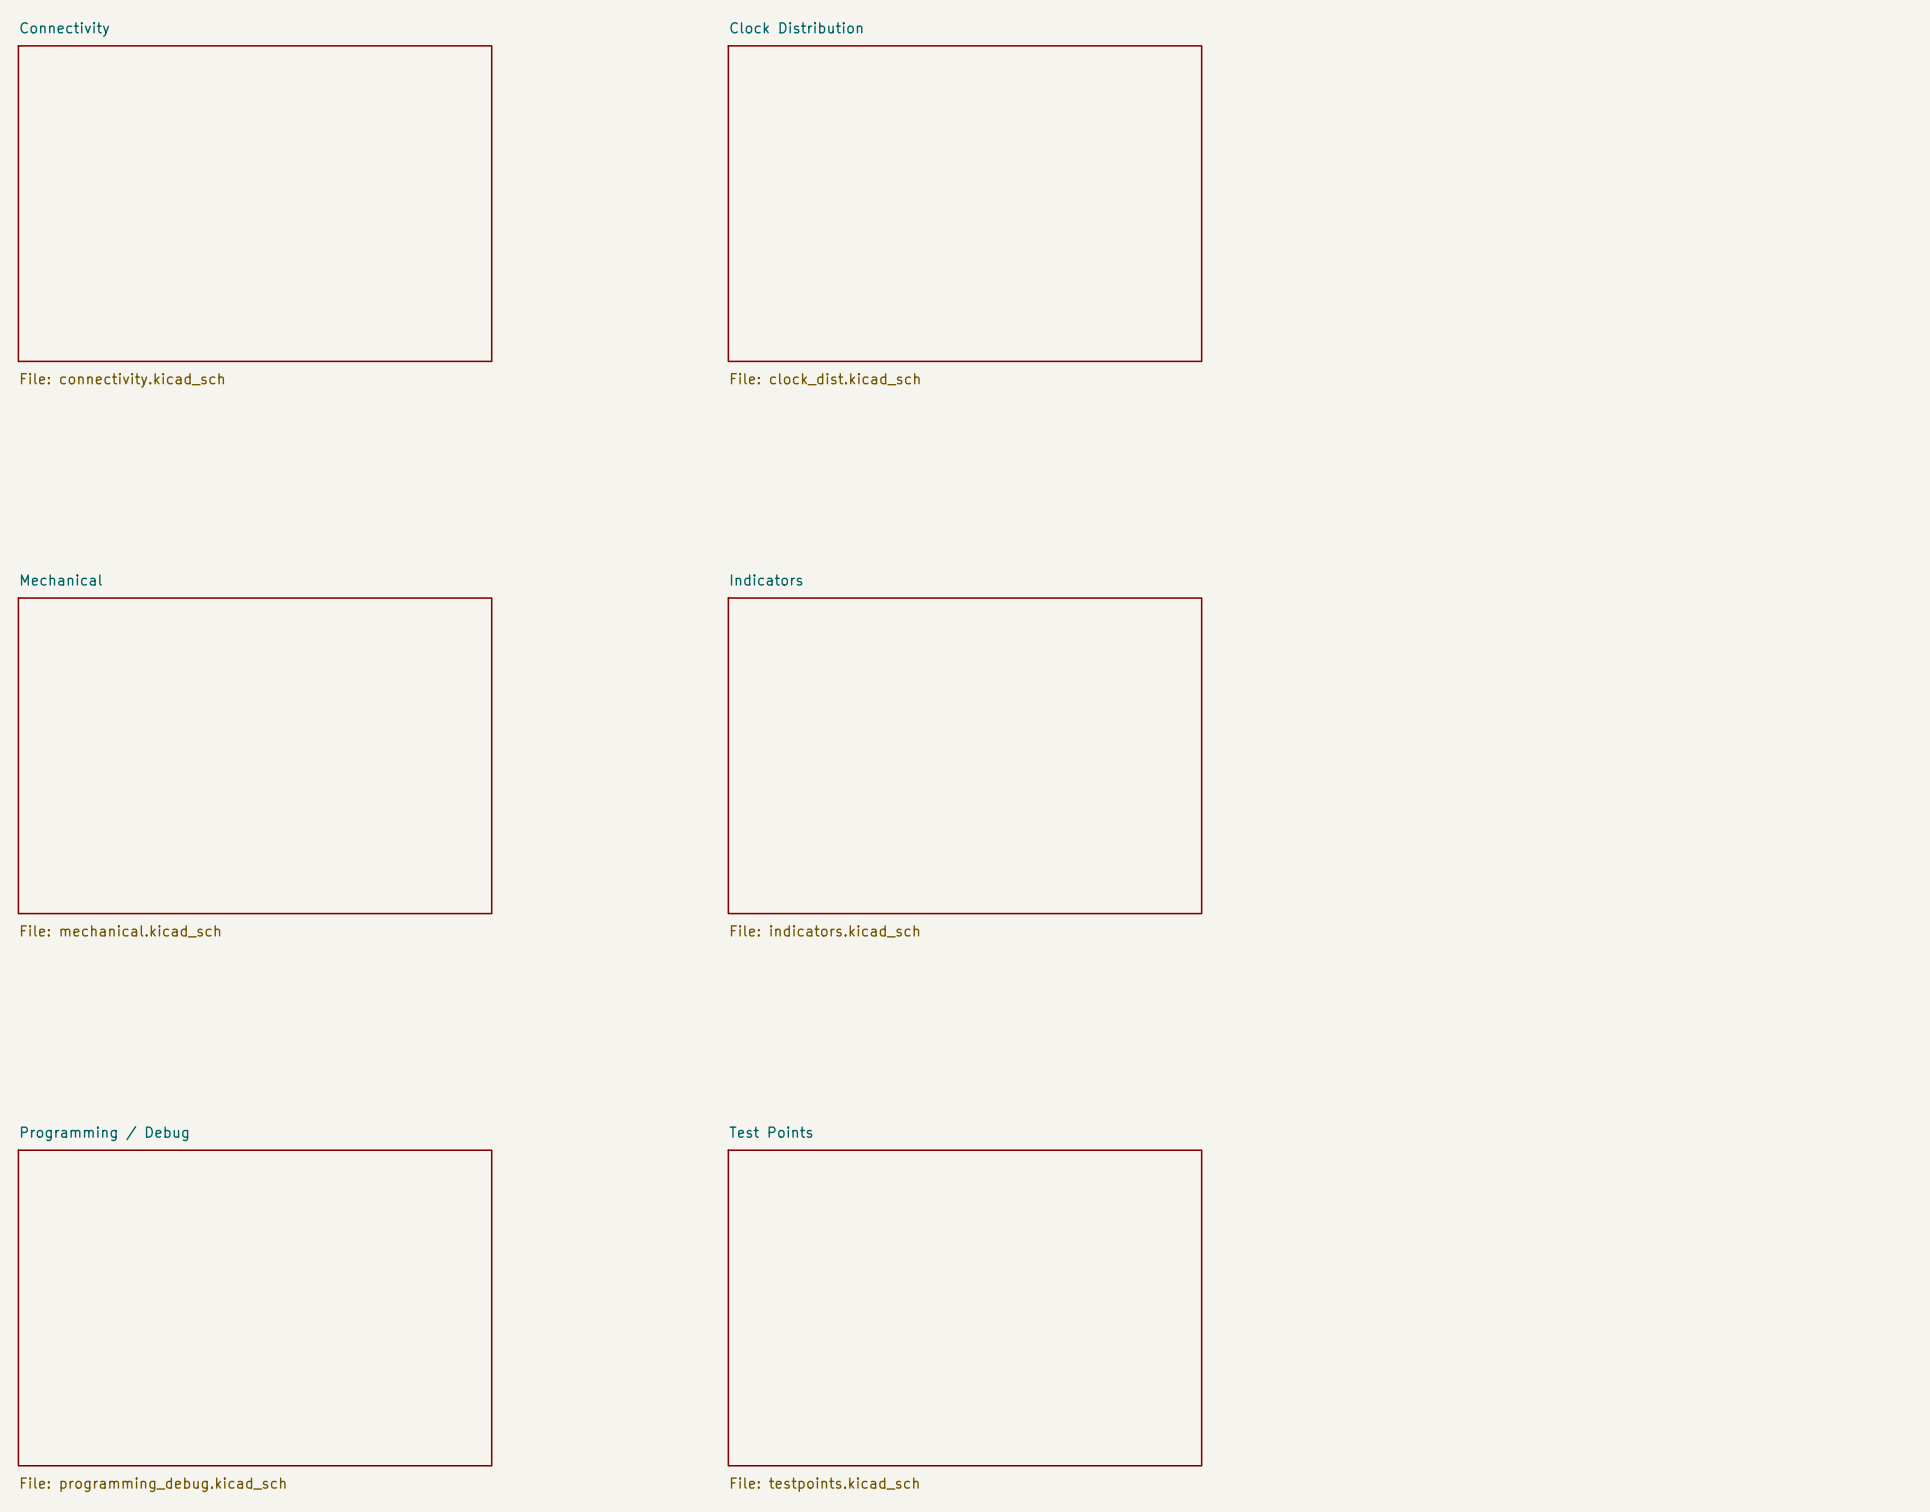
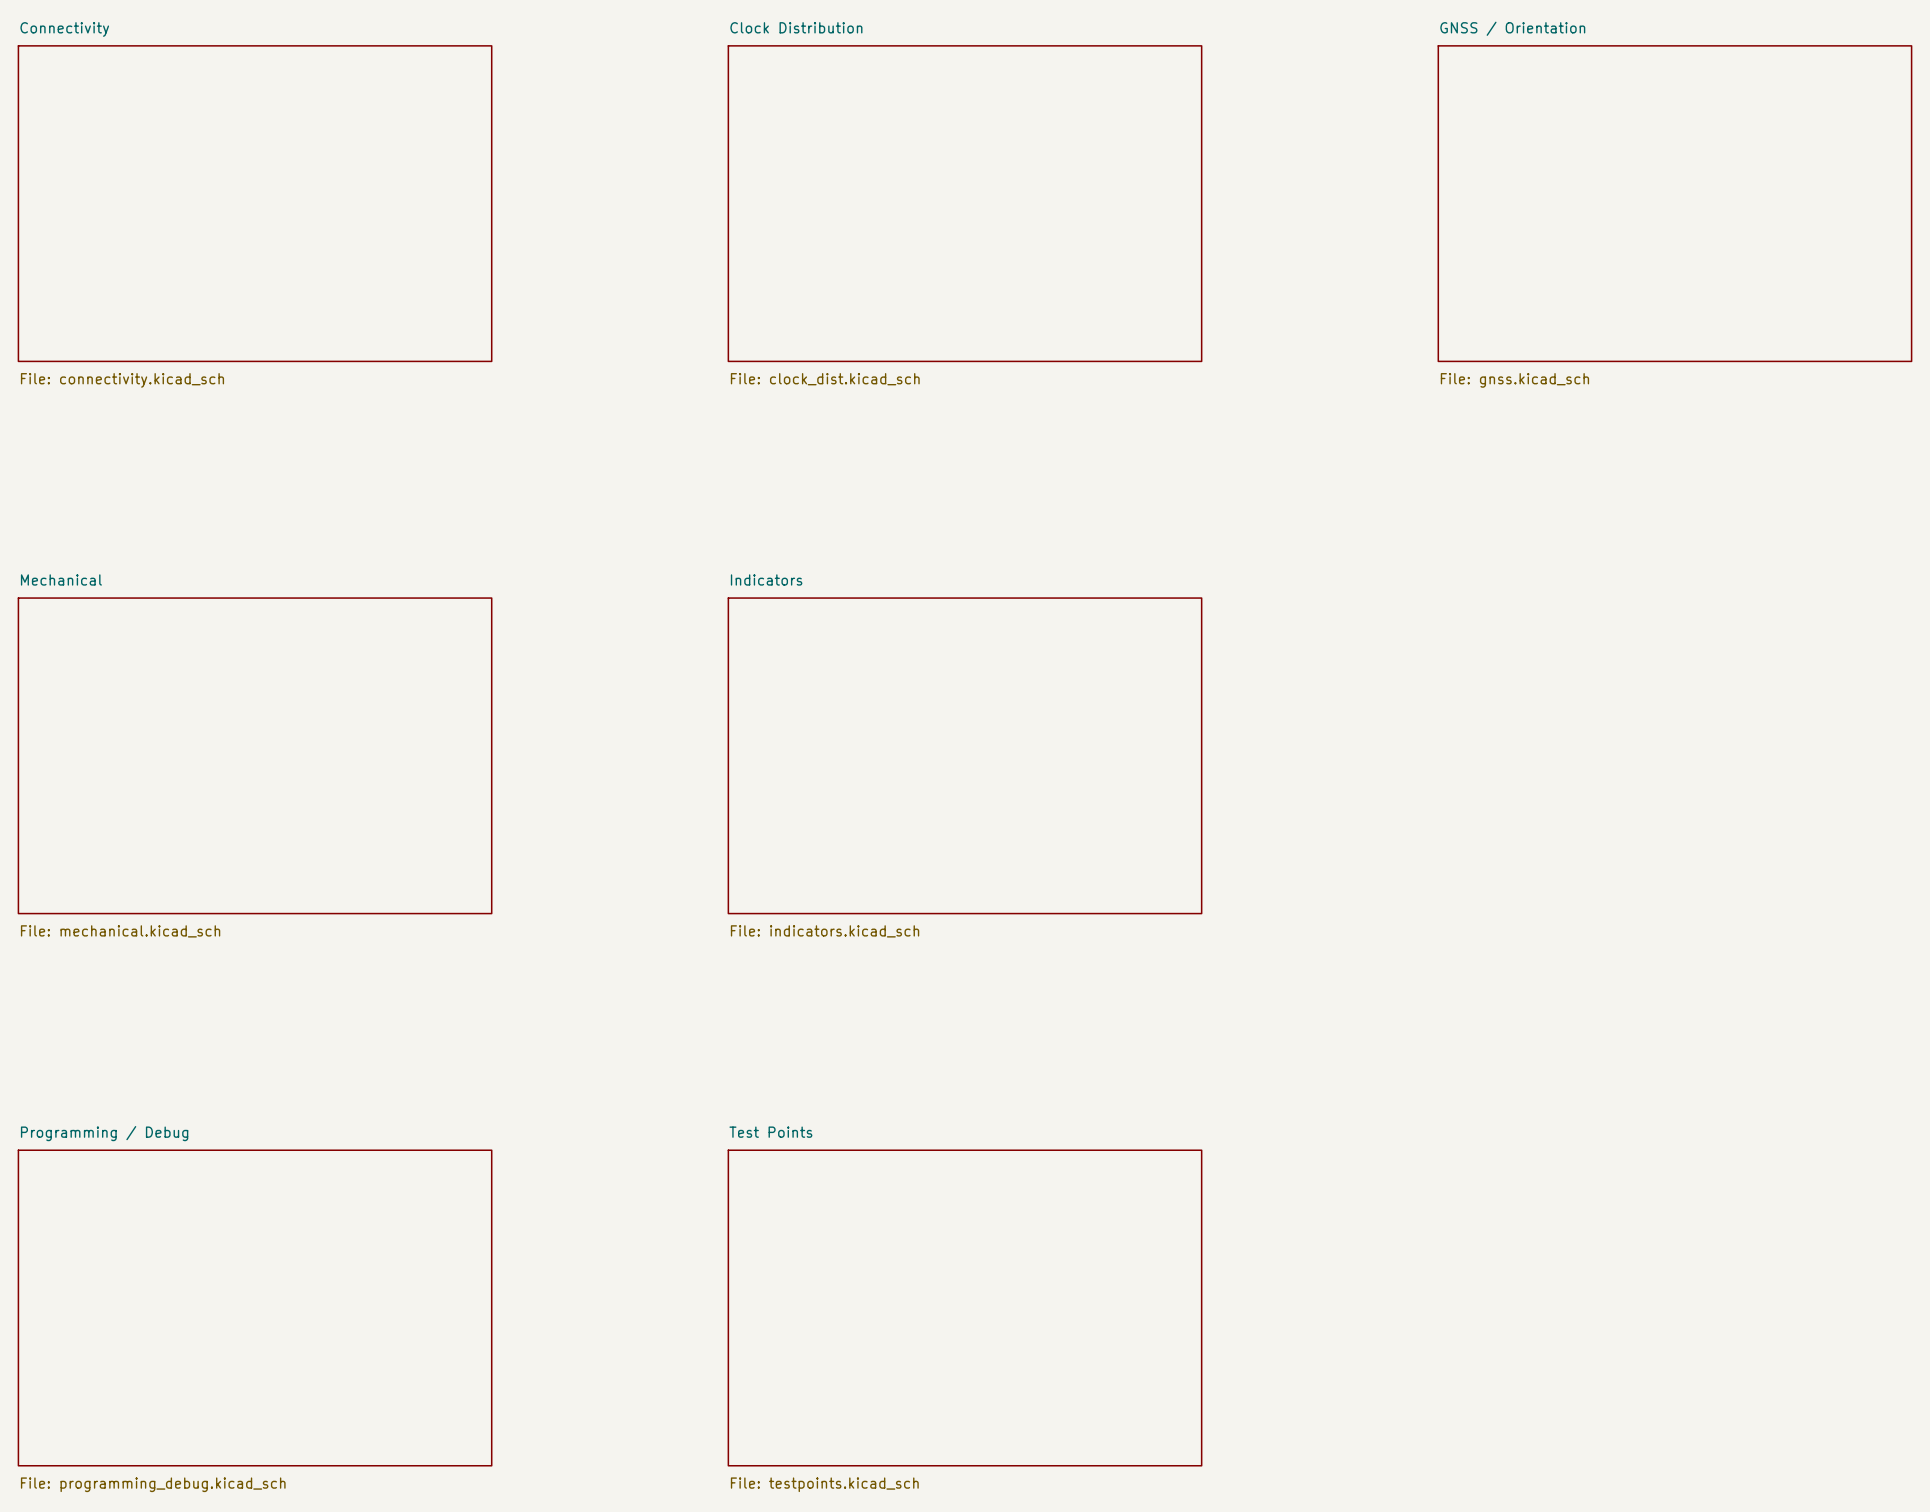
sheet GNSS / Orientation: none -> File: gnss.kicad_sch (1674, 203)

